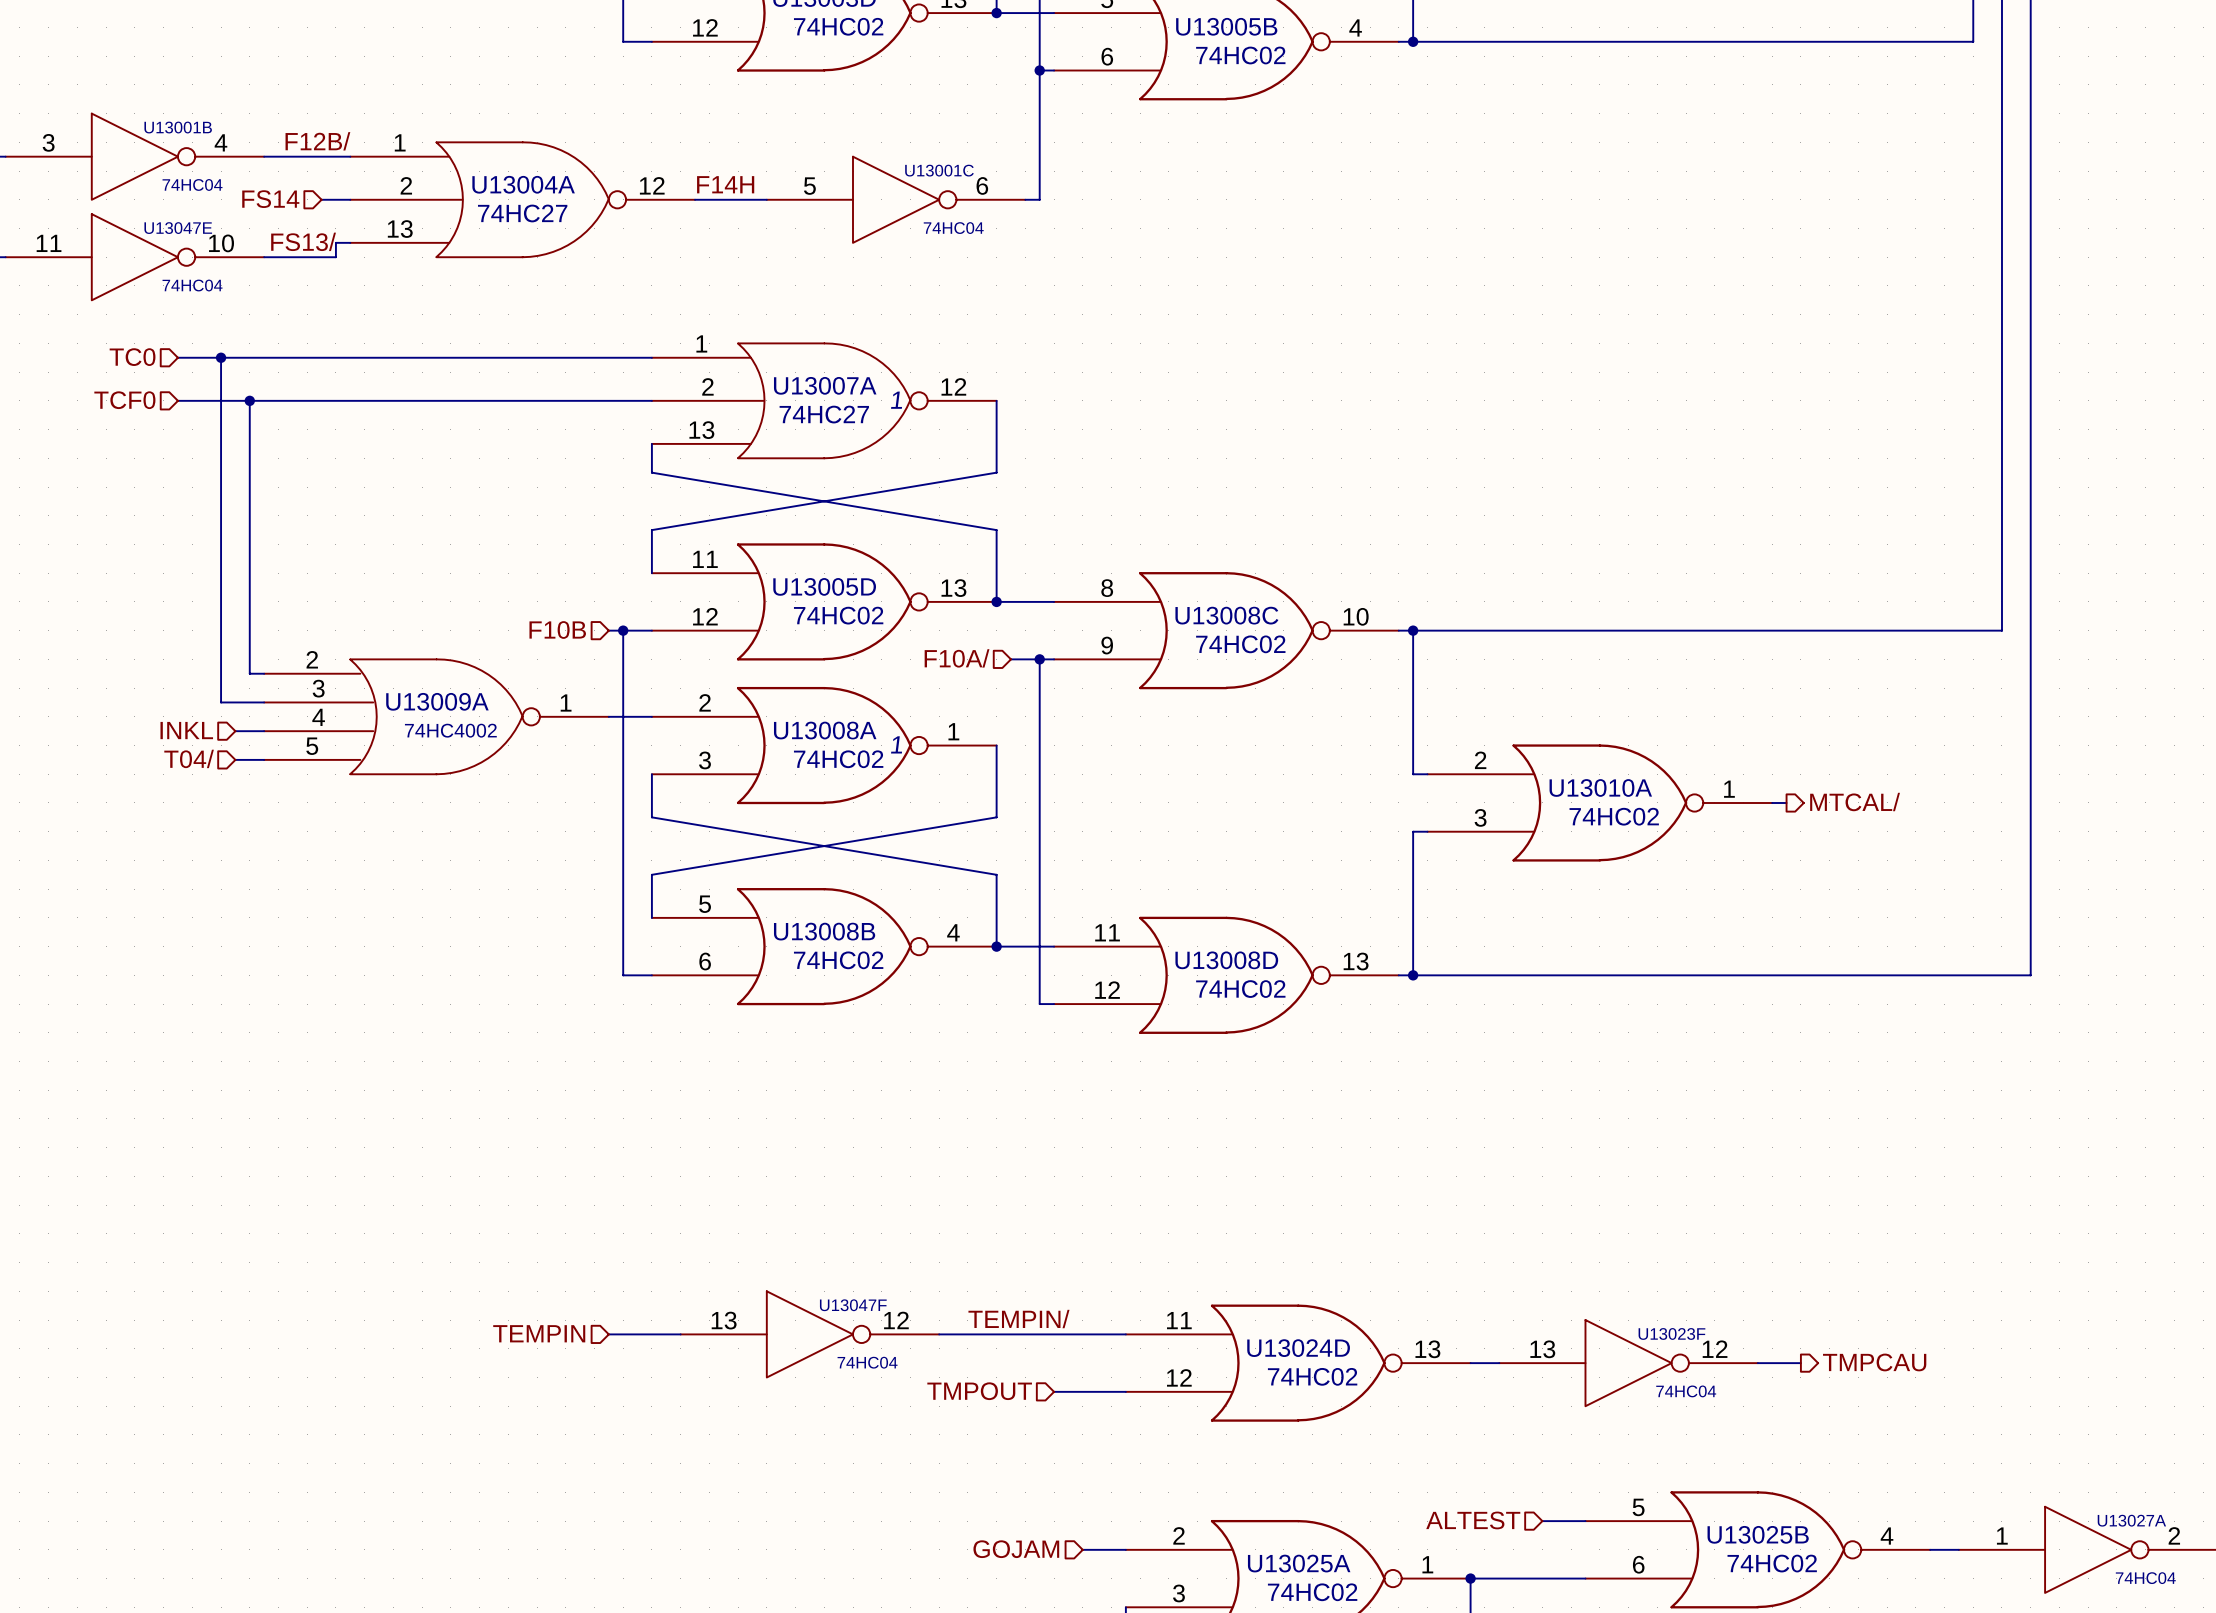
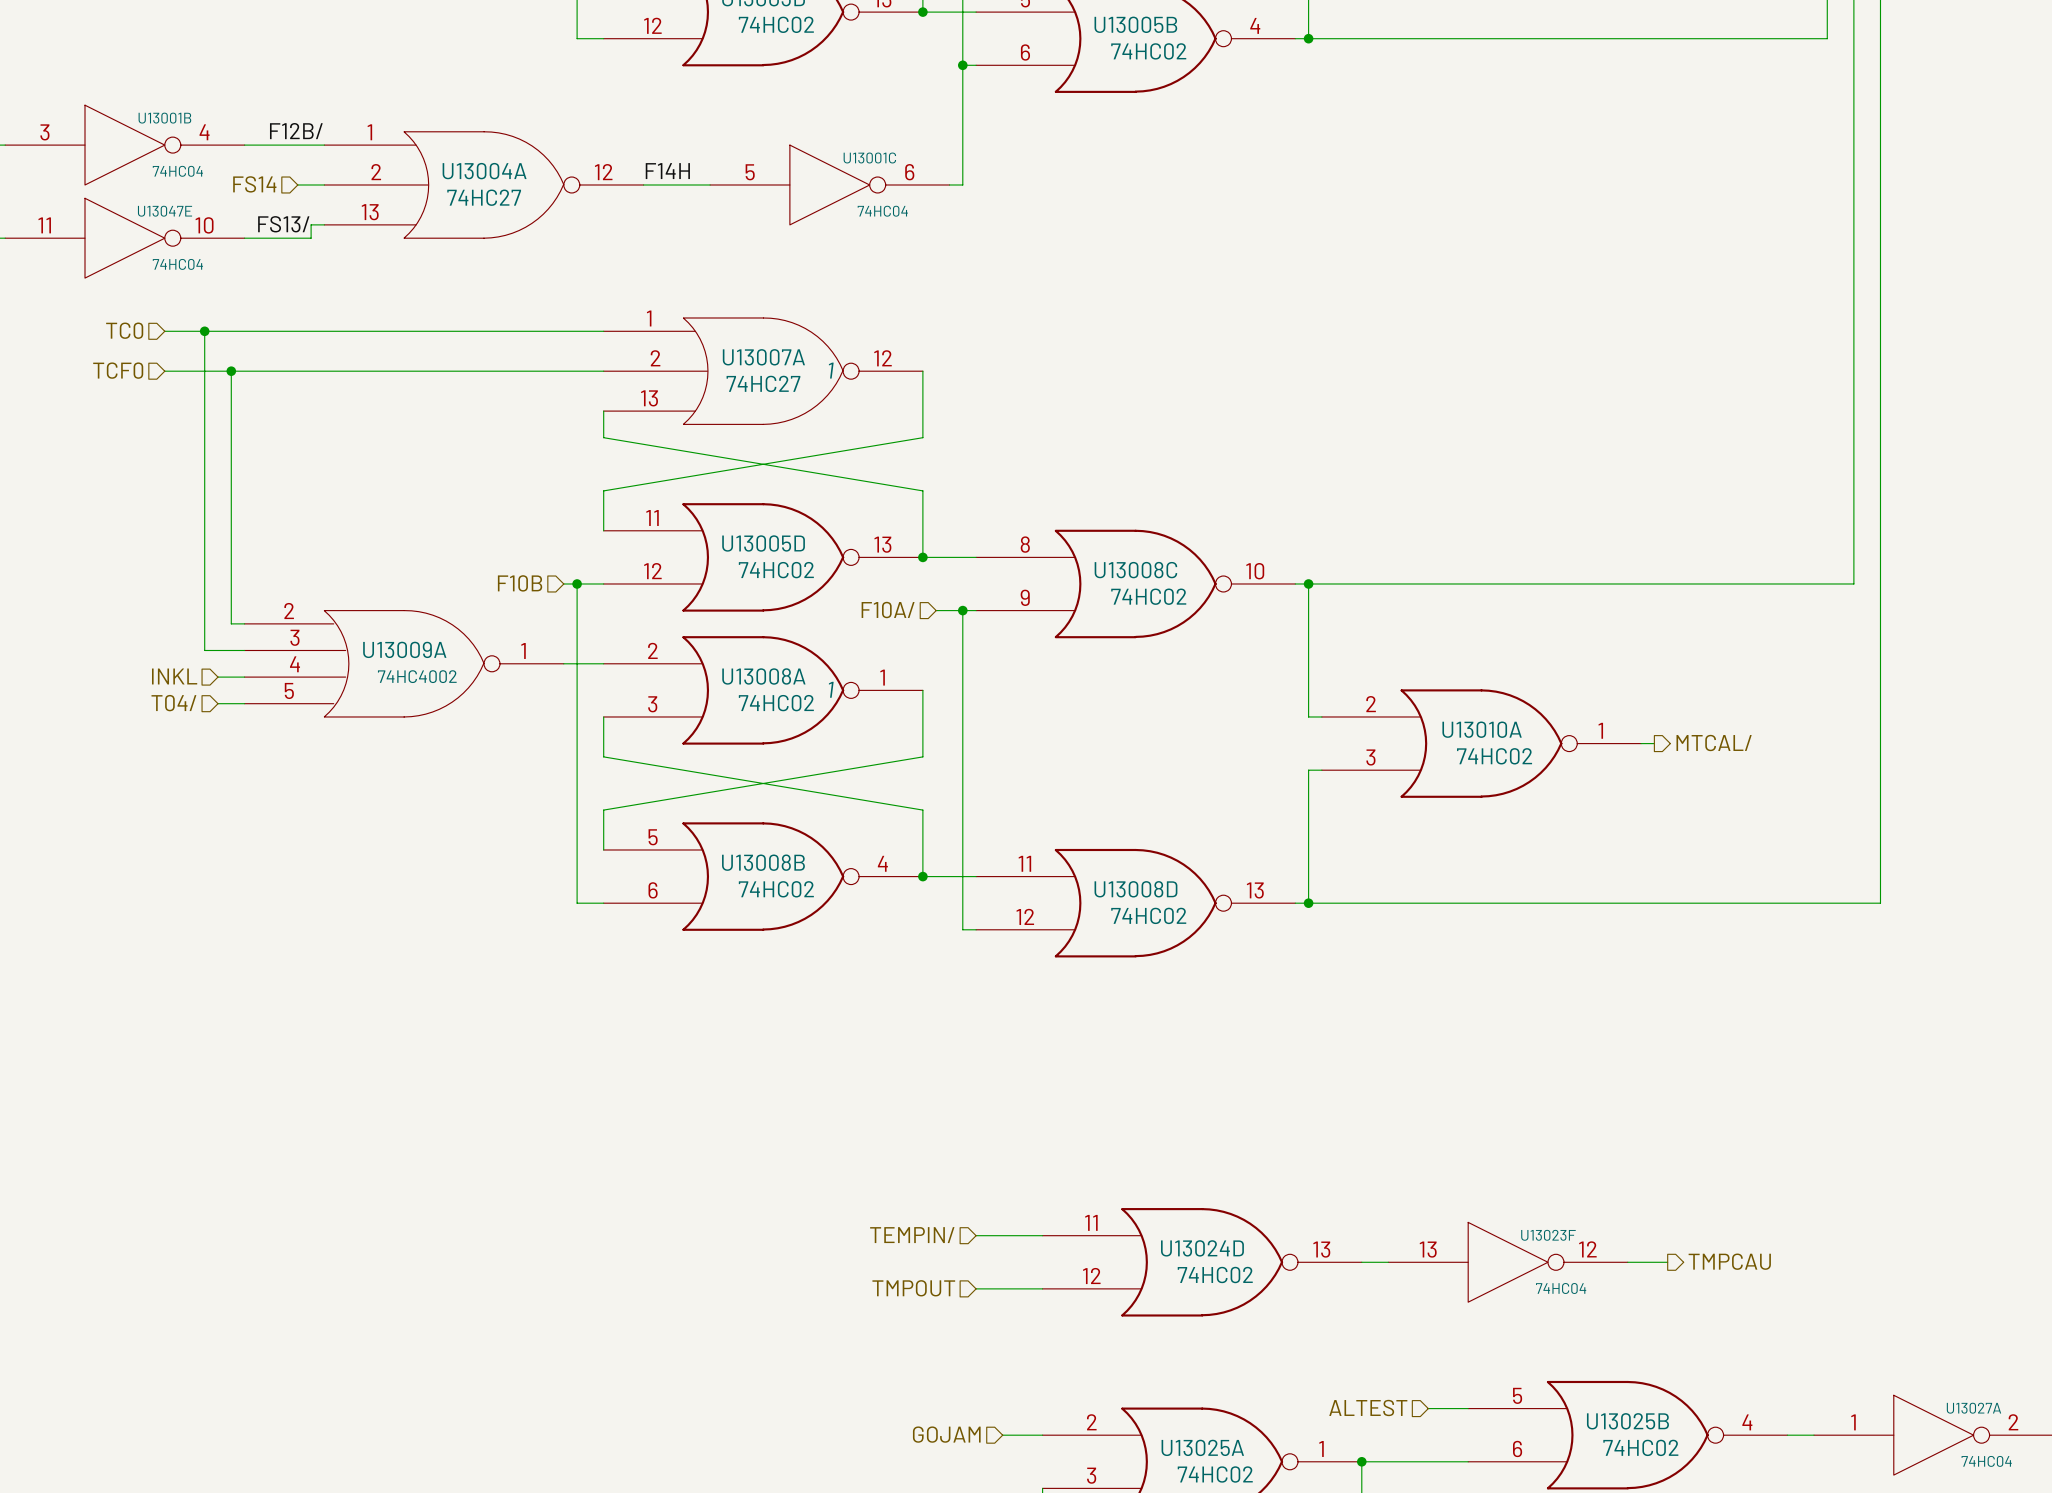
label: TEMPIN/ (1018, 1319) -> none
hierarchical label: TEMPIN (539, 1333) -> none
hierarchical label: none -> TEMPIN/ (912, 1235)
wire: (608, 1334) (680, 1334) -> none
U13047F: 74HC04 (809, 1334) -> none
wire: (939, 1334) (1054, 1334) -> none

